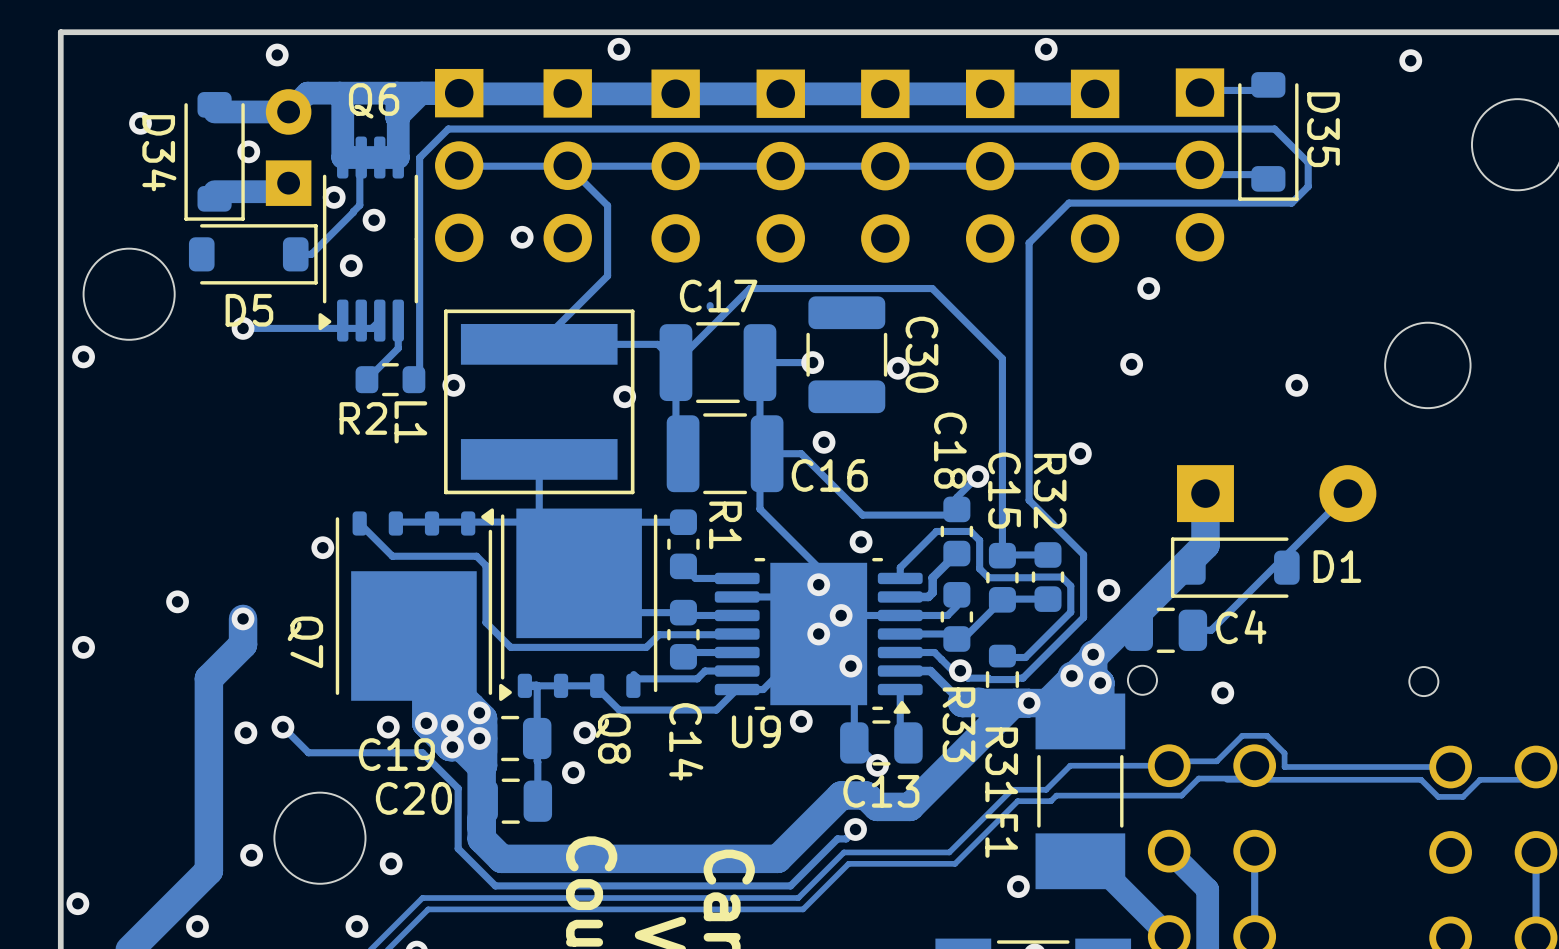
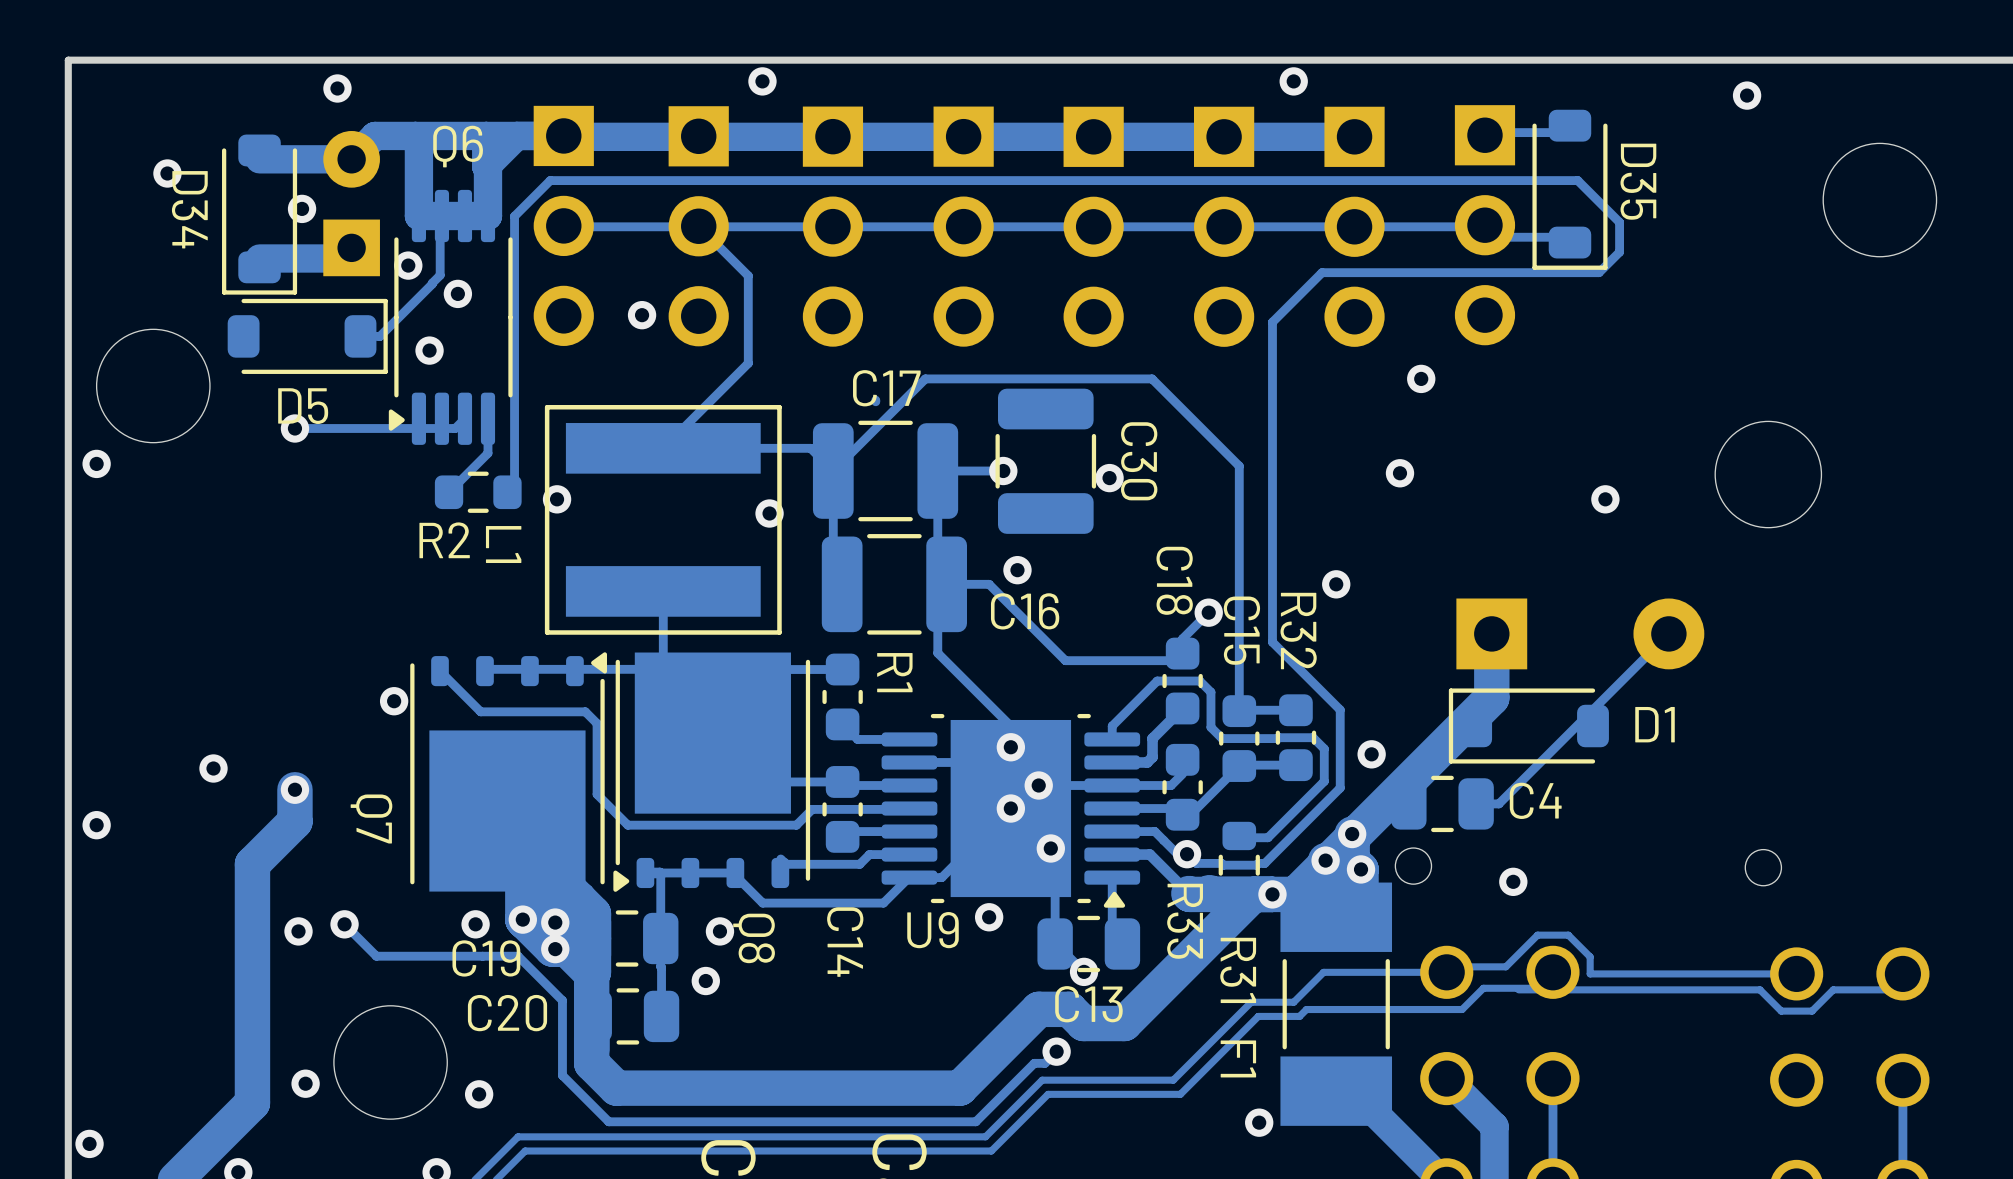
via: (861, 542) -> none
via: (479, 712) -> none
via: (479, 738) -> none

